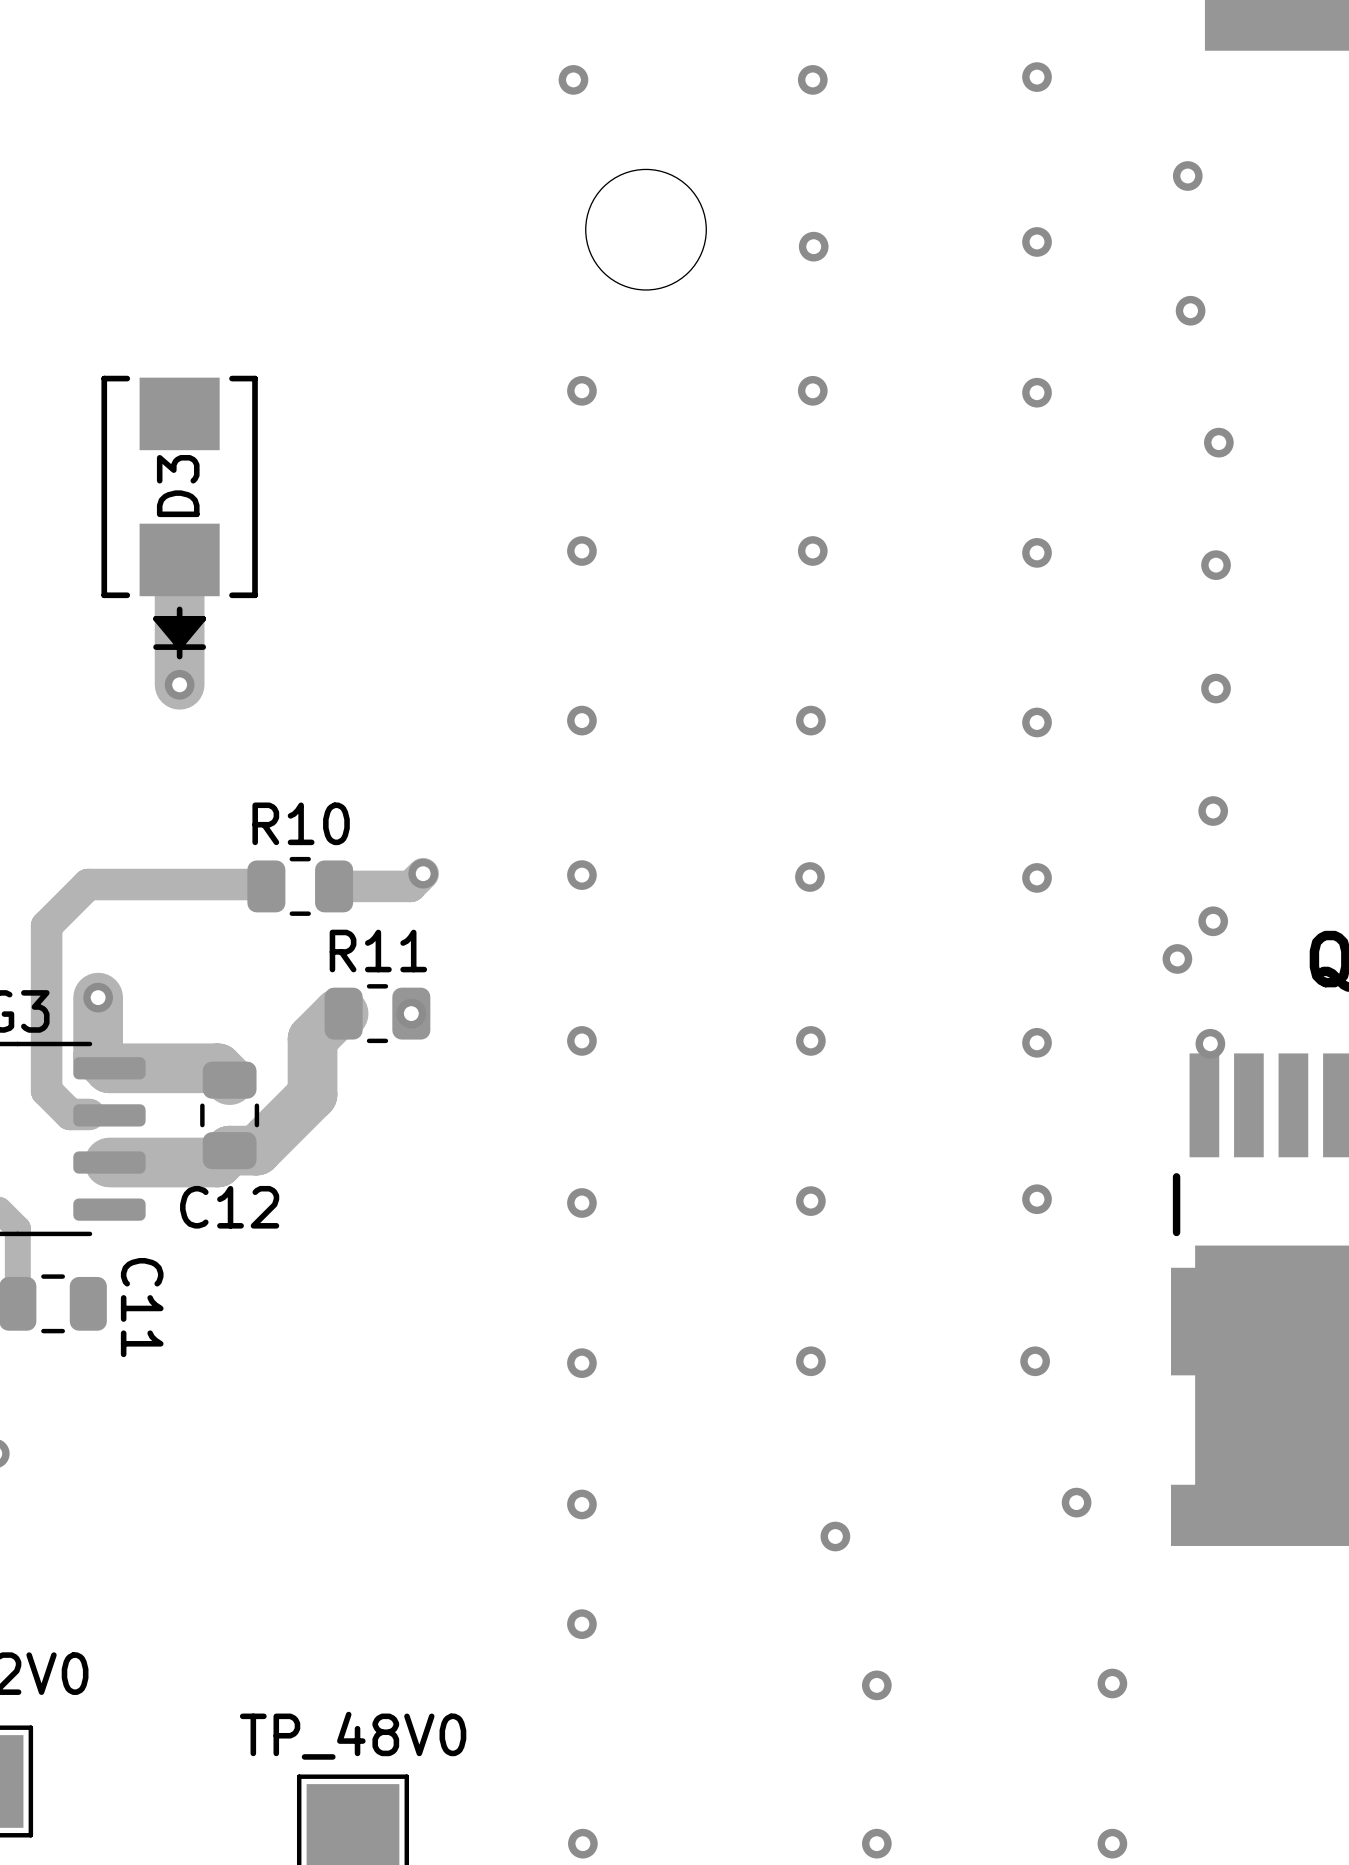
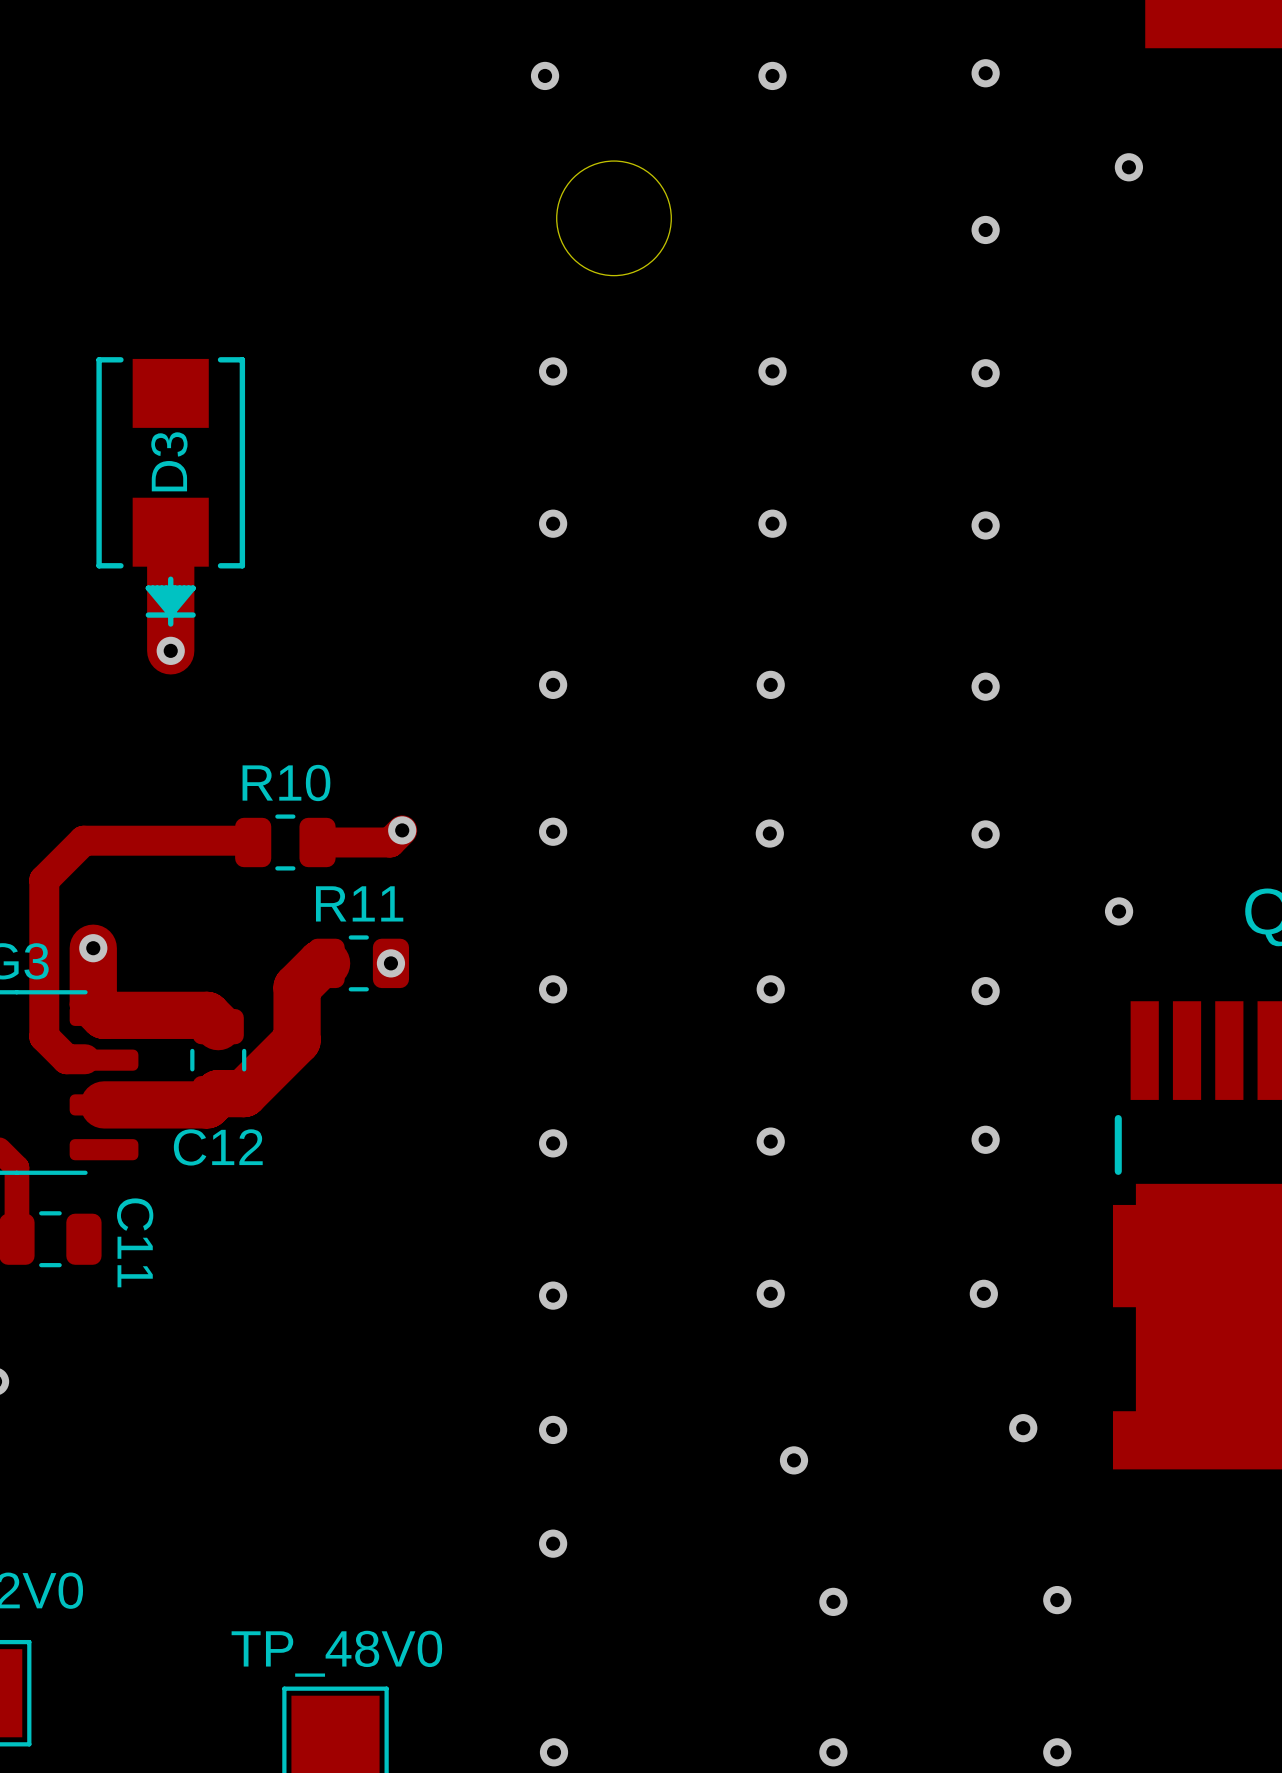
via: (813, 246) -> none
via: (1190, 310) -> none
via: (1218, 442) -> none
via: (1216, 565) -> none
via: (1216, 688) -> none
via: (1213, 811) -> none
via: (1213, 921) -> none
via: (1210, 1043) -> none

